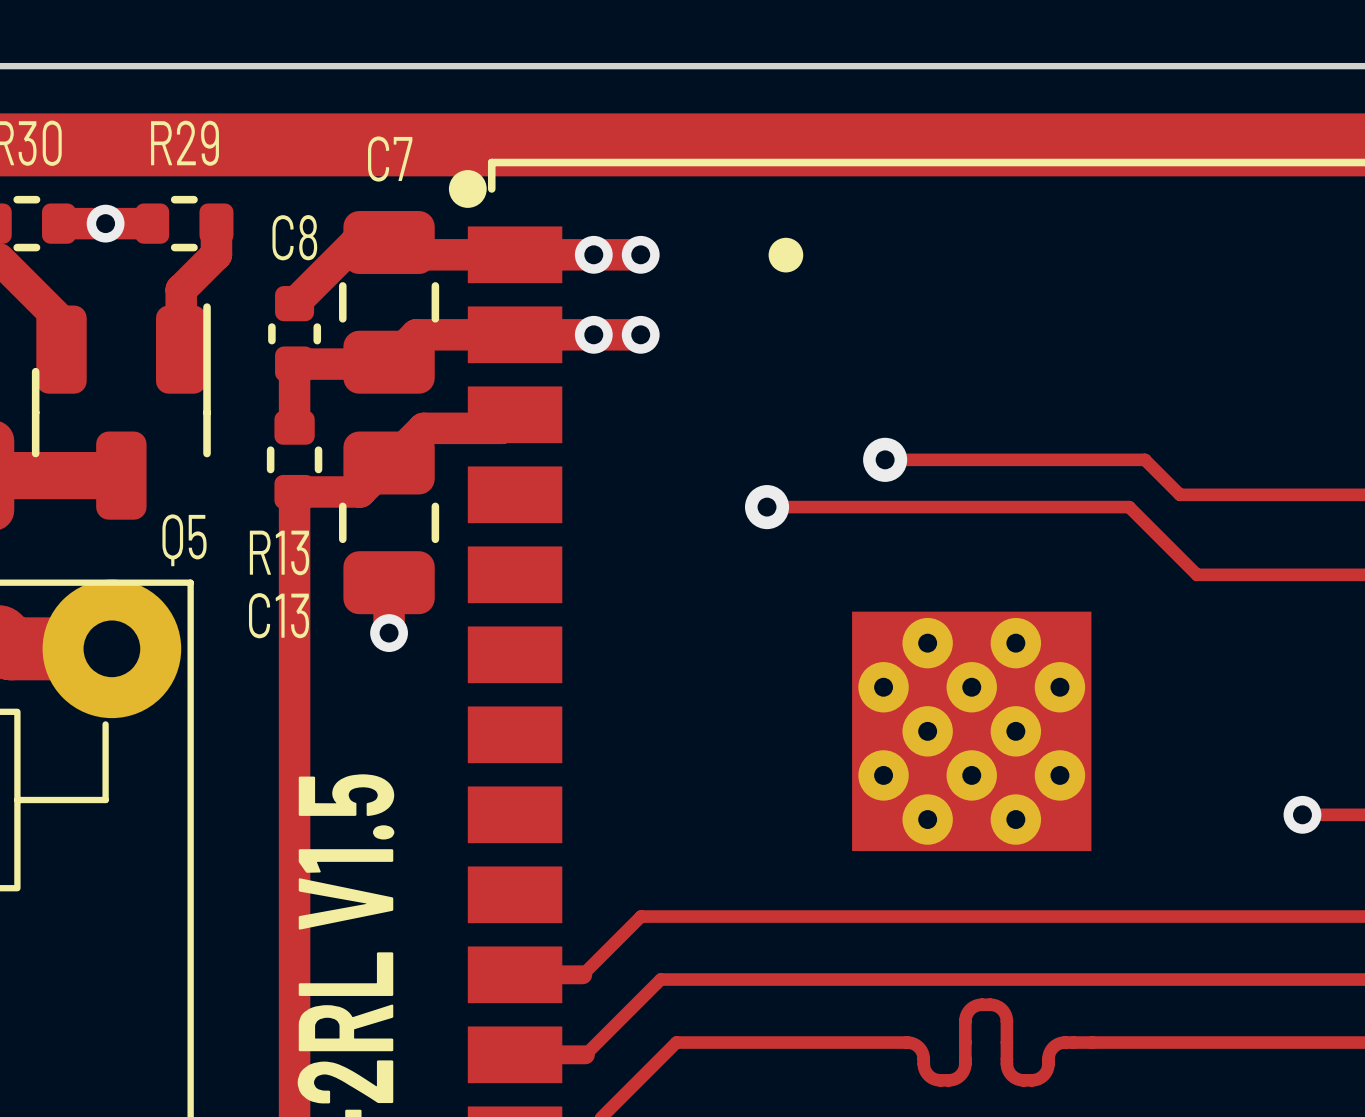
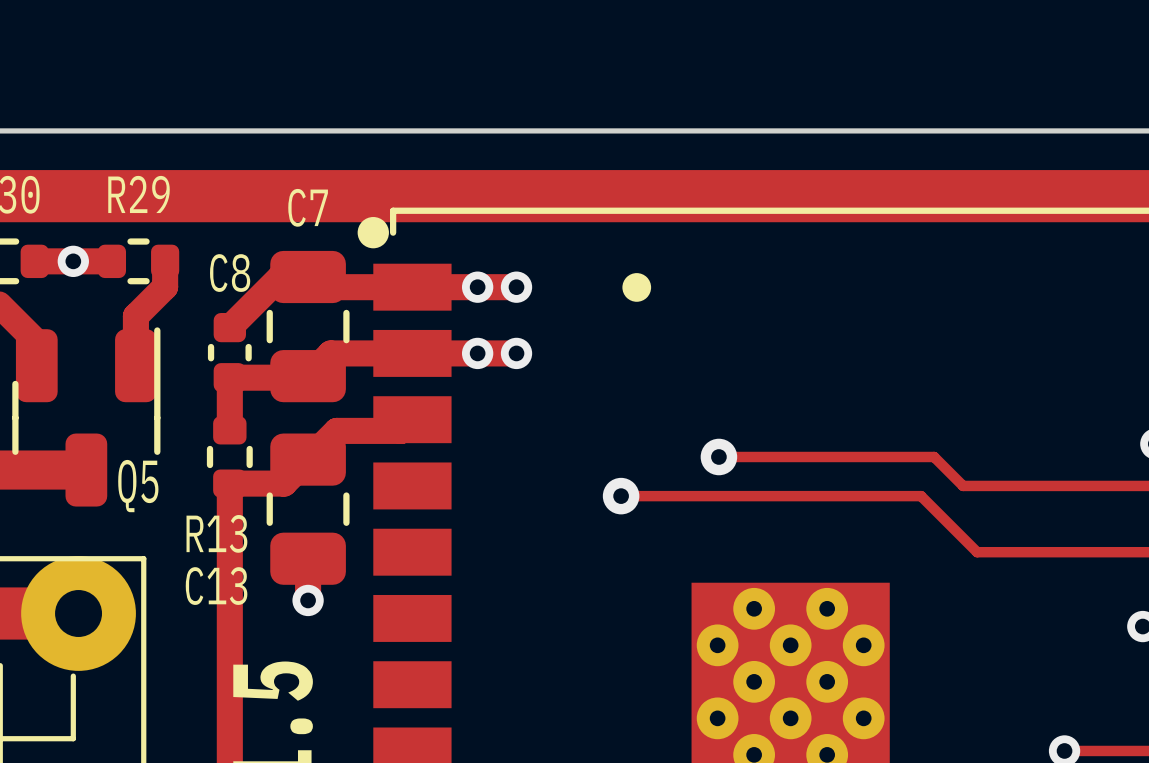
Q5 name position: Q5 (184, 540) -> Q5 (138, 486)

